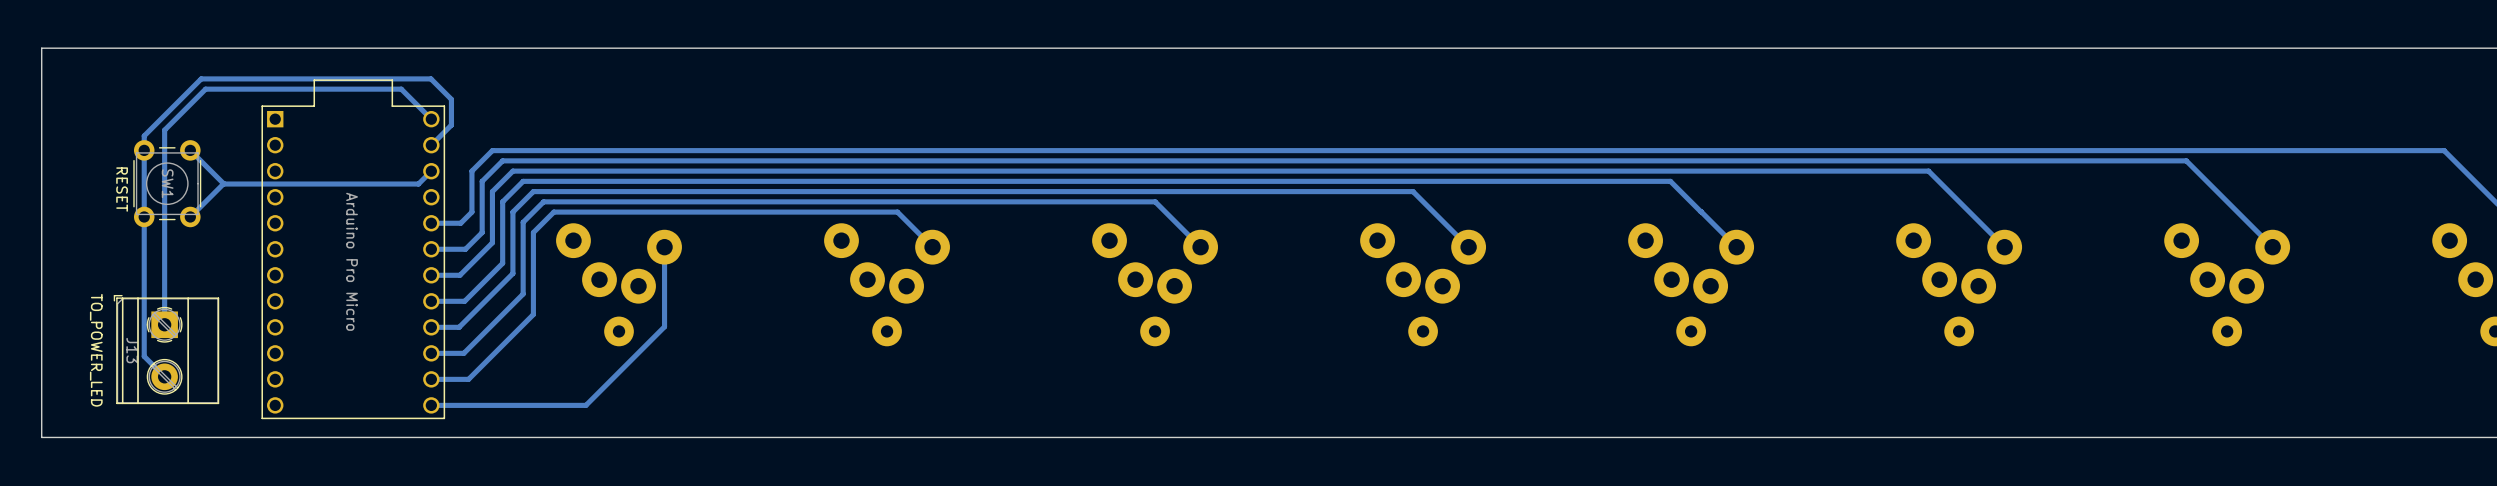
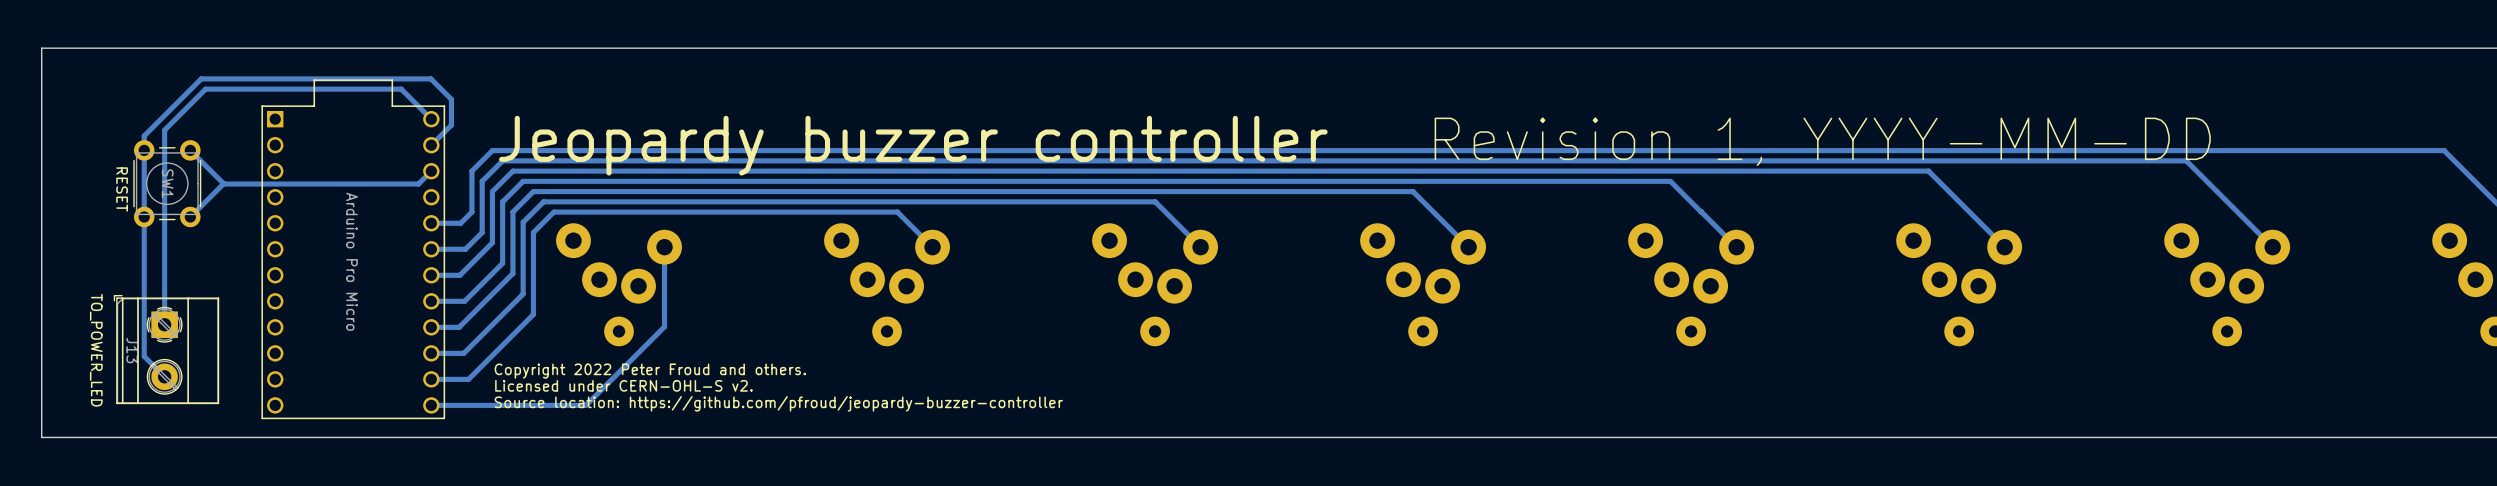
text: none -> Revision 1, YYYY-MM-DD (1822, 141)
text: none -> Jeopardy buzzer controller (913, 145)
text: none -> Copyright 2022 Peter Froud and others. (650, 371)
text: none -> Licensed under CERN-OHL-S v2. (623, 385)
text: none -> Source location: https://github.com/pfroud/jeopardy-buzzer-controller (778, 403)

